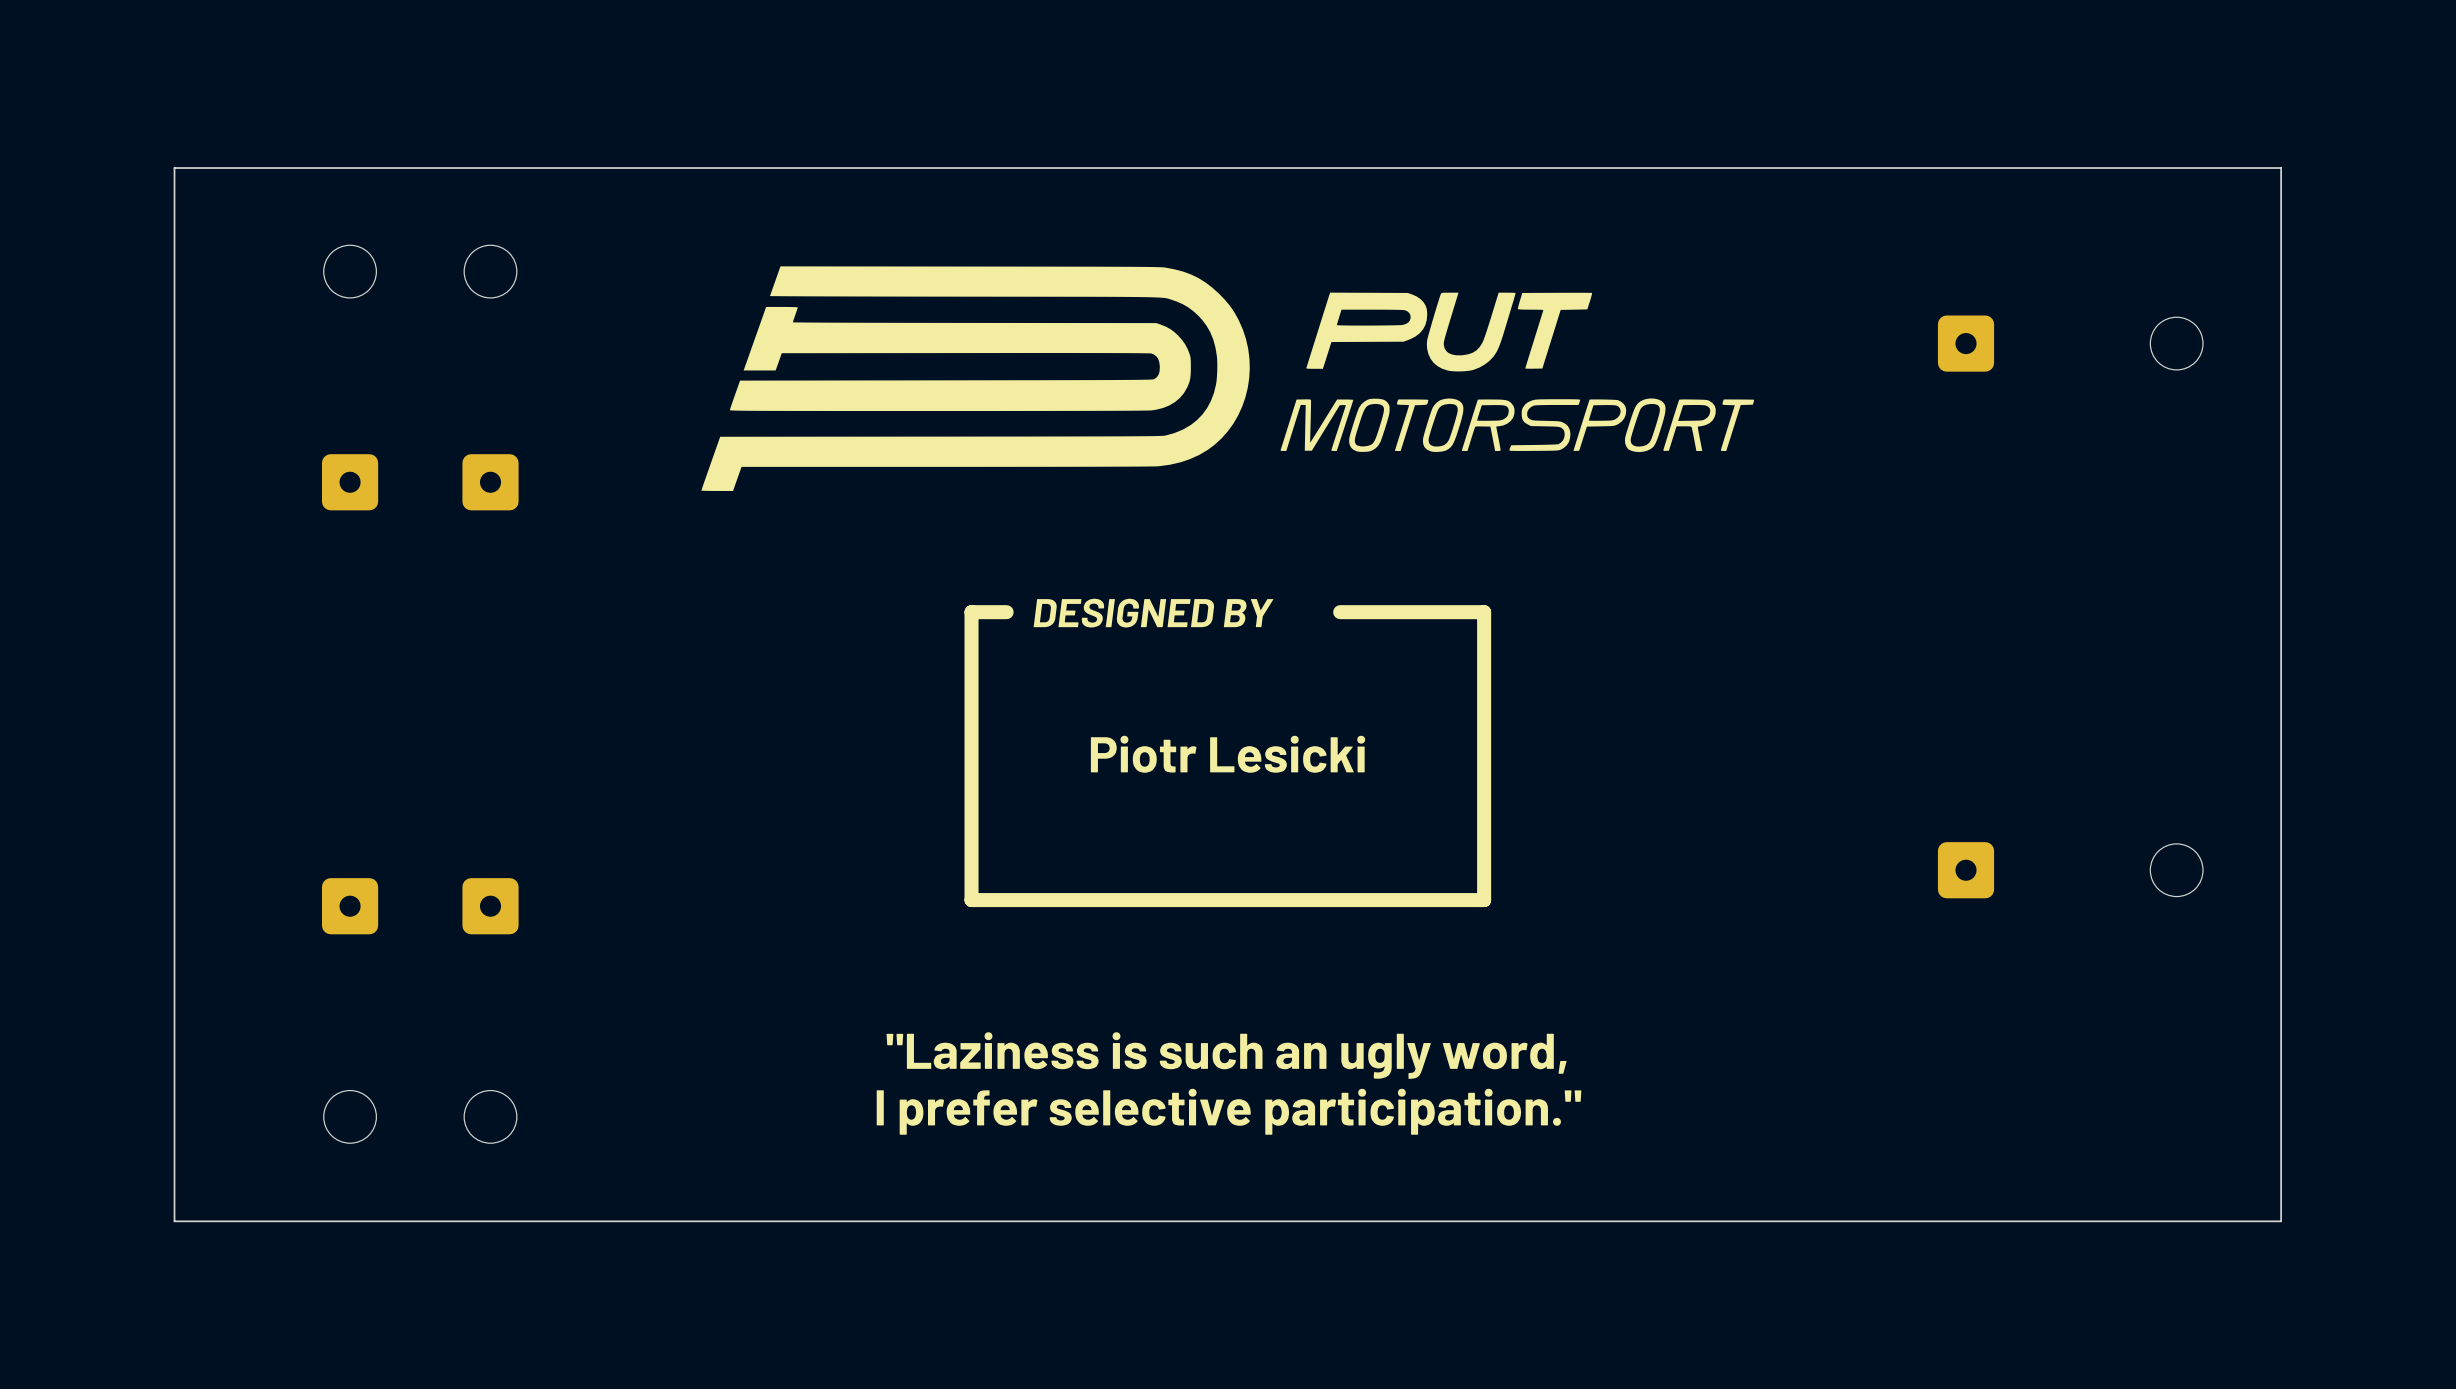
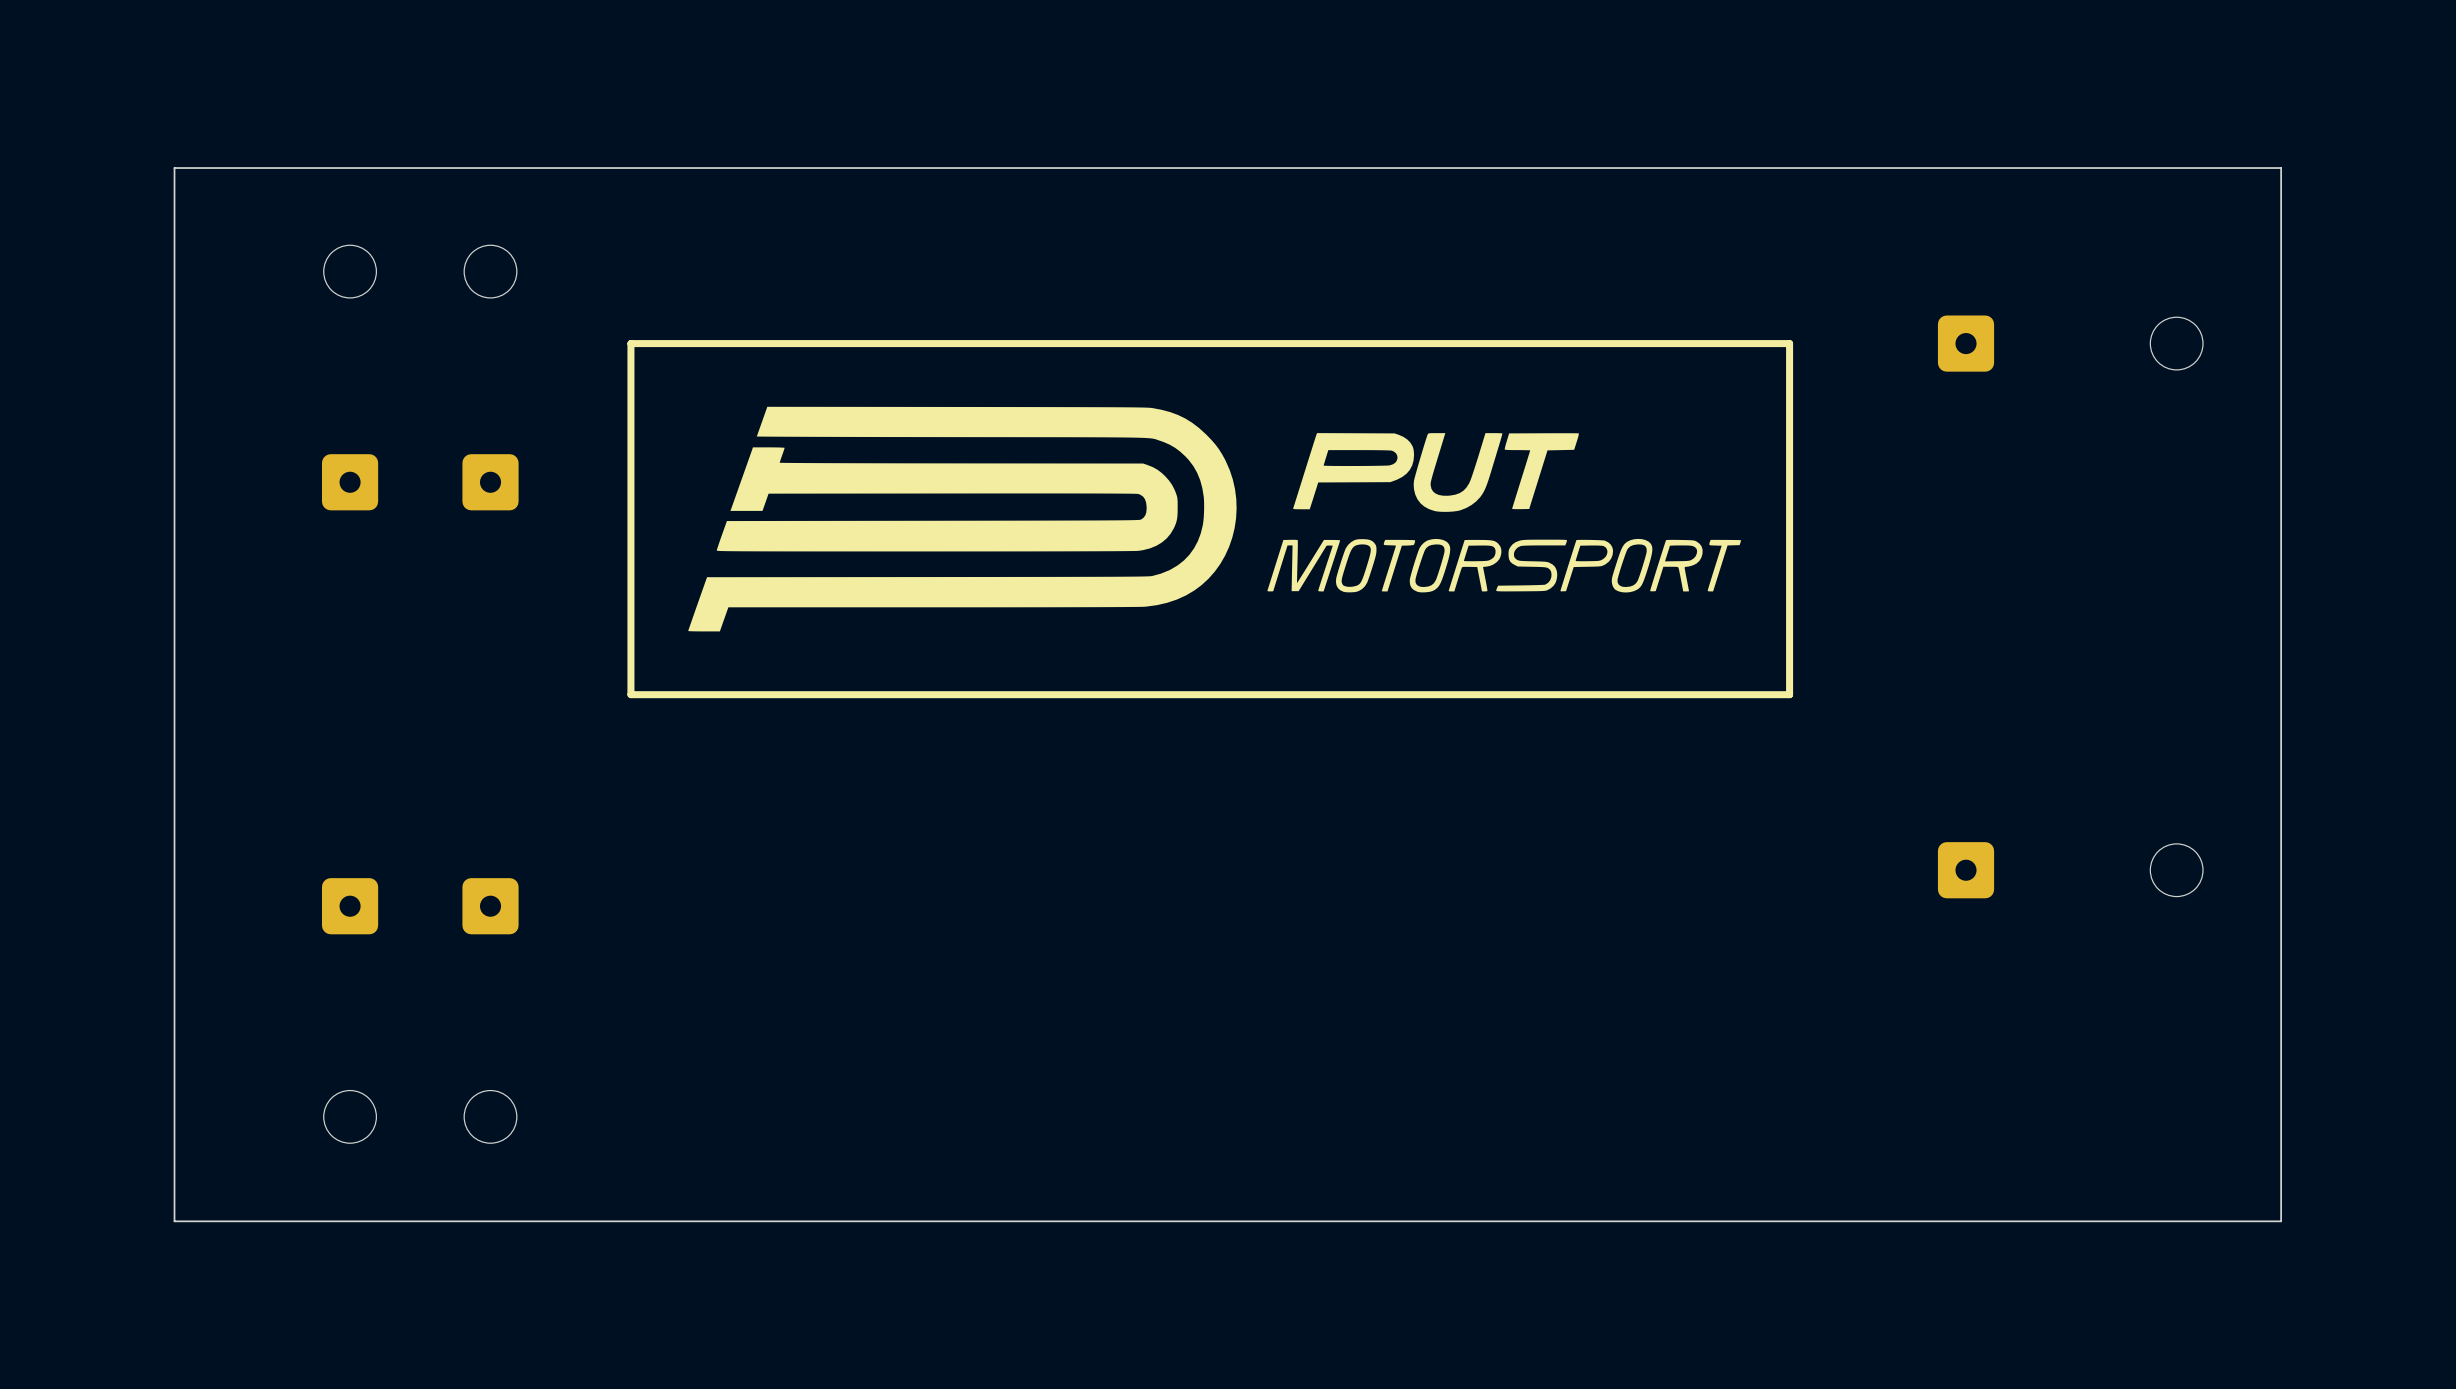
line: none -> (1789, 343) (630, 343) (630, 694) (1789, 694) (1789, 343)
drawing position: (1227, 378) -> (1214, 519)
drawing: [964, 605, 1492, 908] -> none
text: "Laziness is such an ugly word, (1226, 1055) -> none
text: I prefer selective participation." (1229, 1111) -> none

